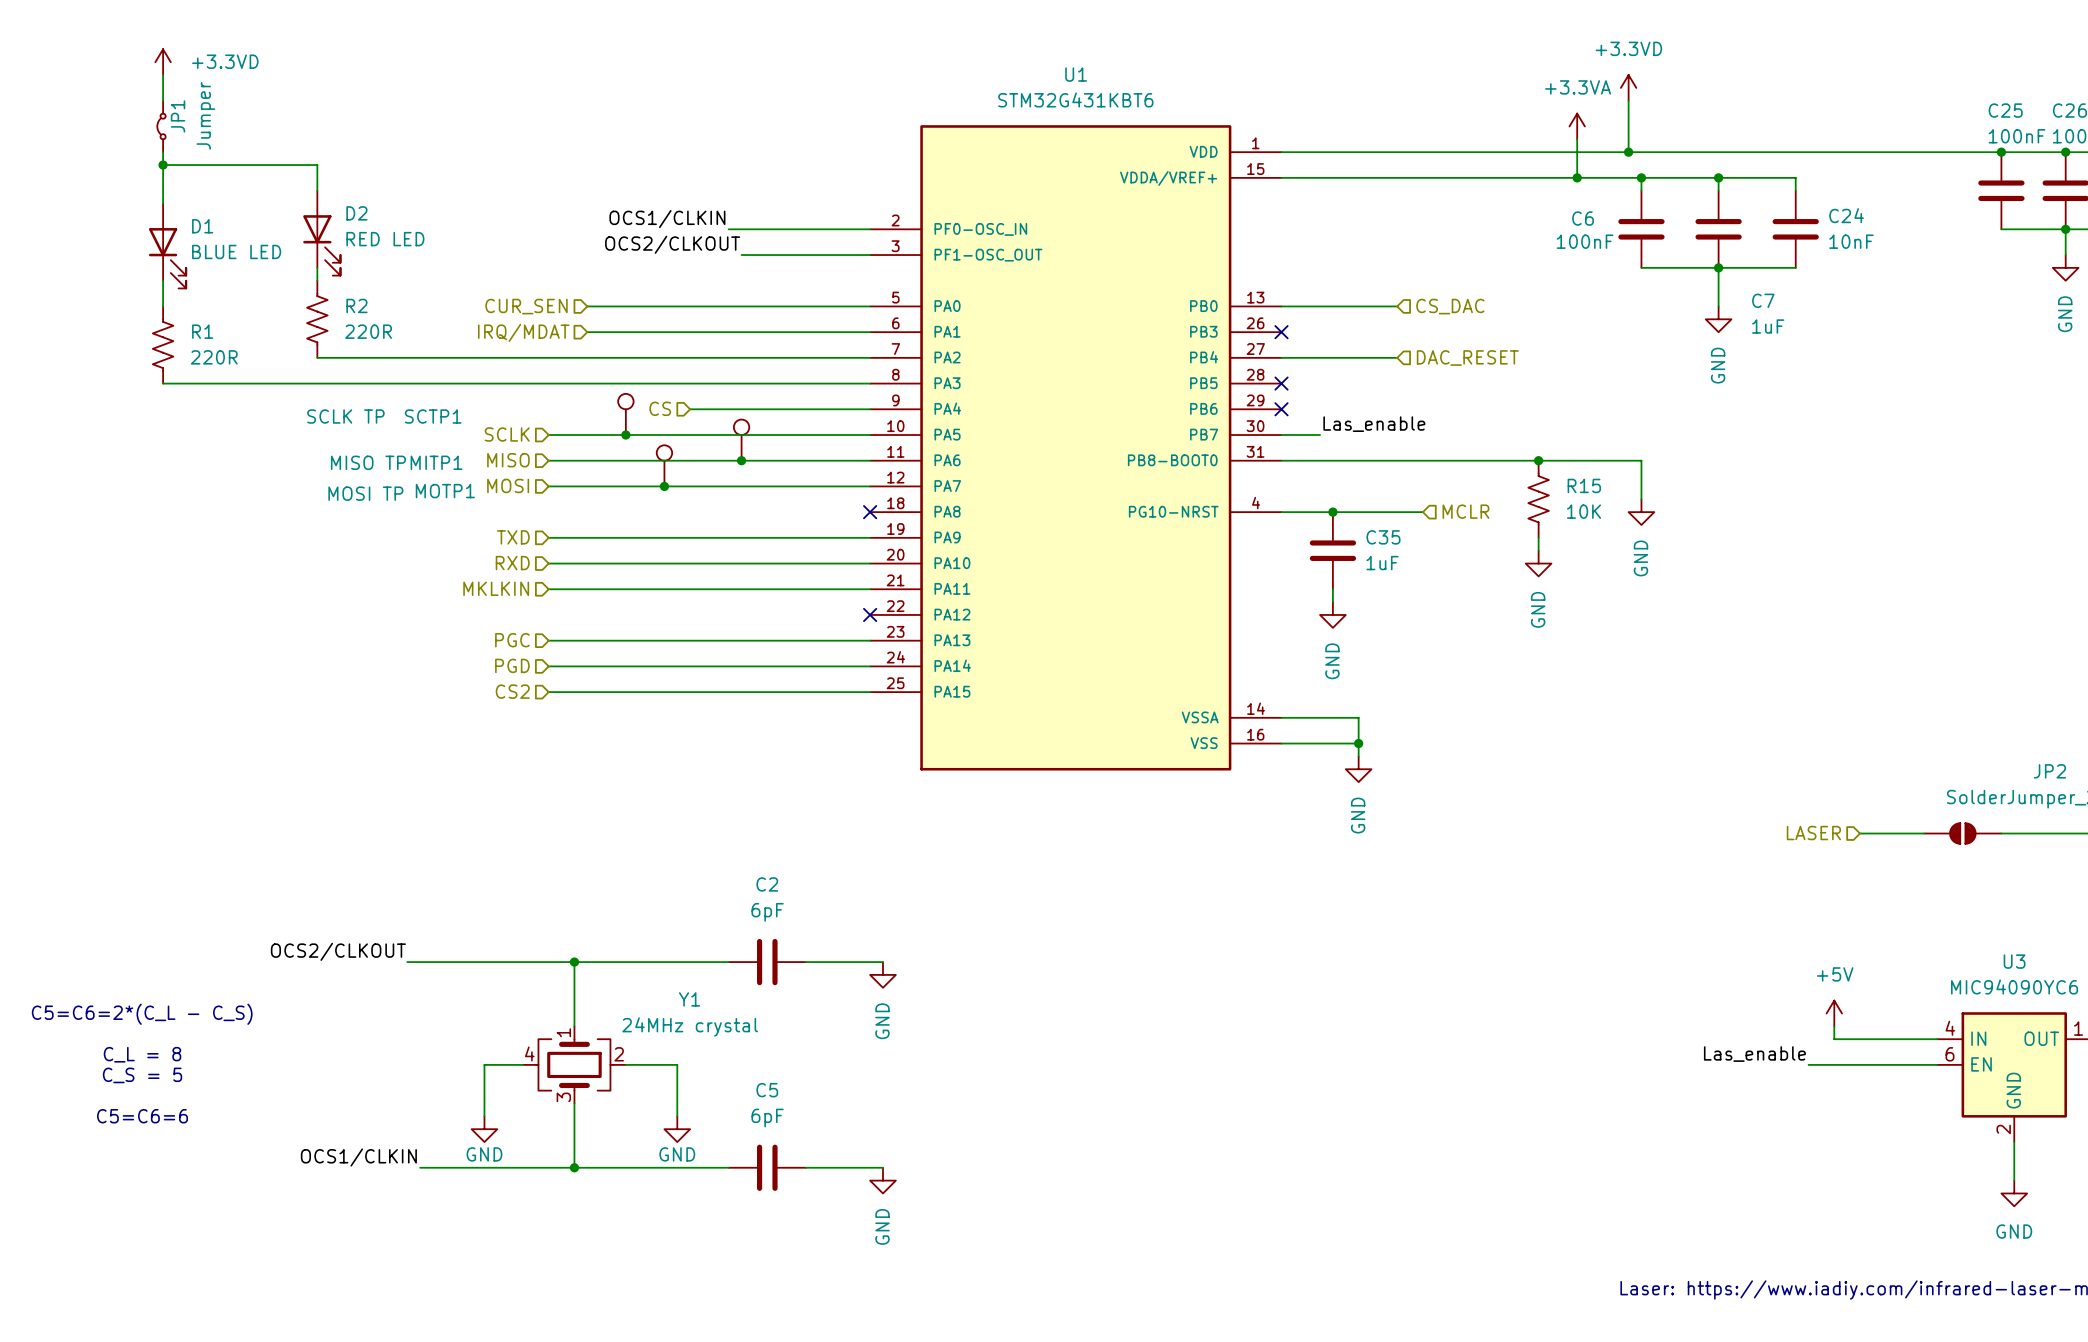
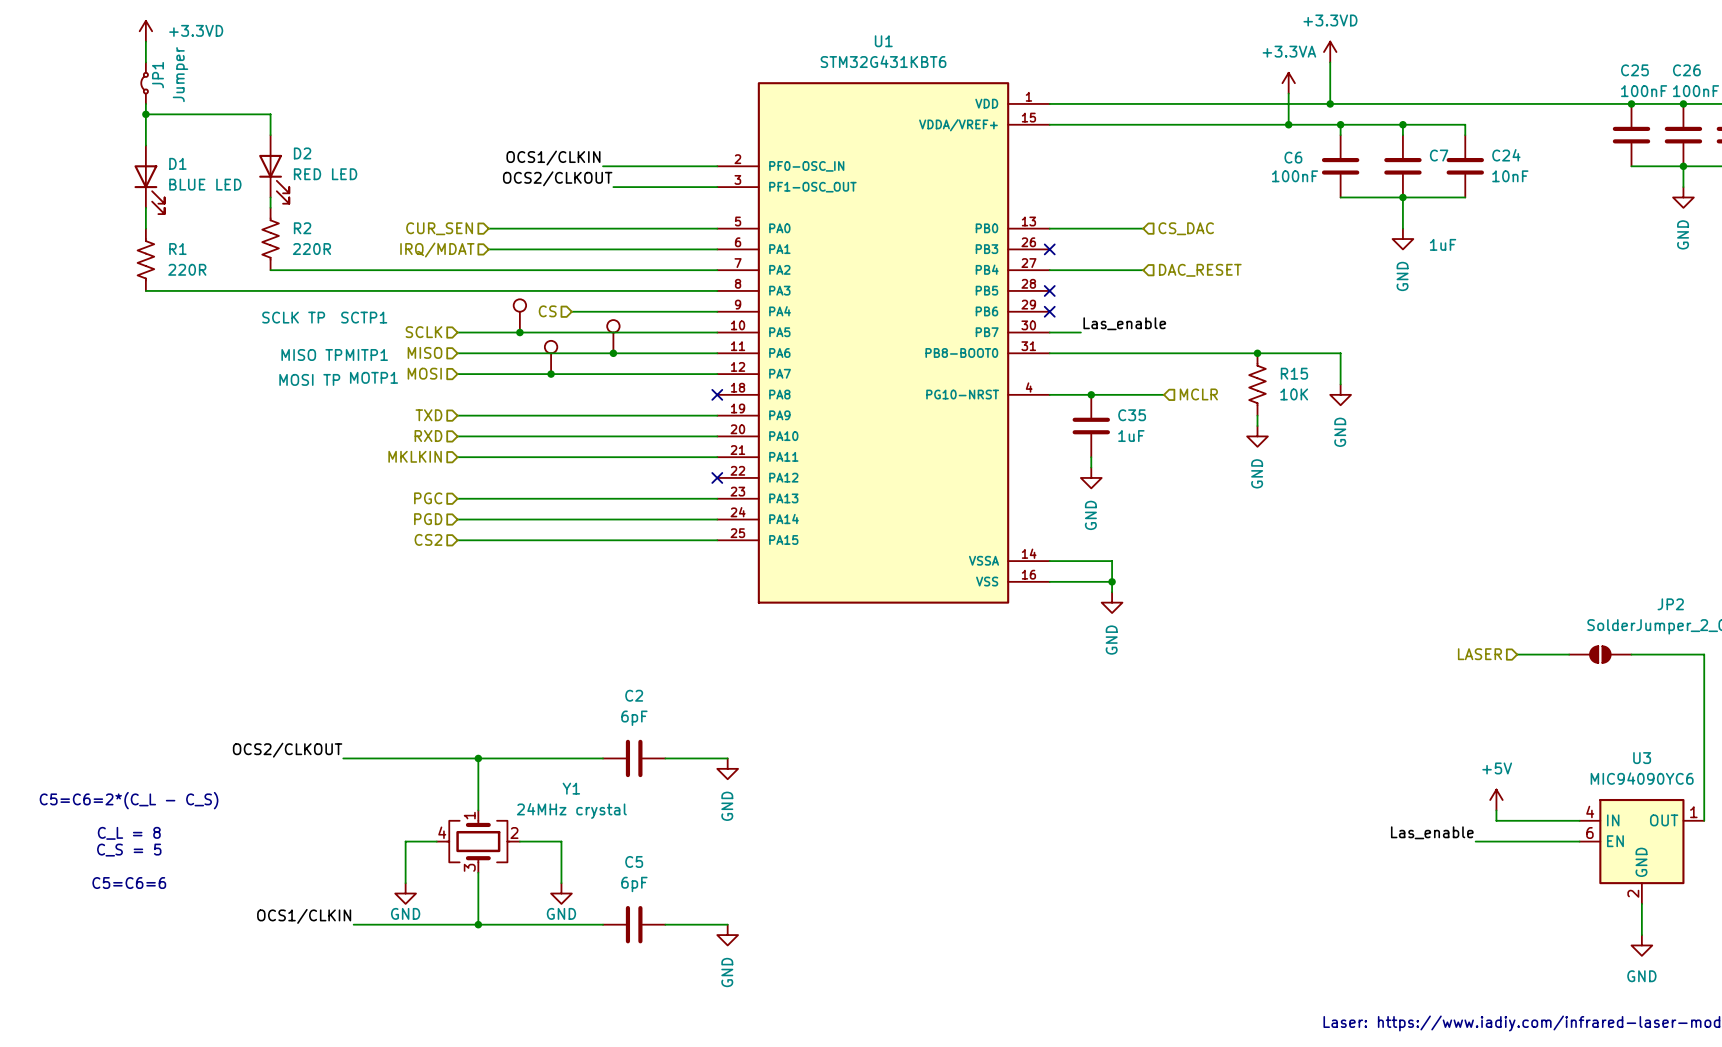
C7 name position: C7 (1763, 300) -> C7 (1439, 155)

